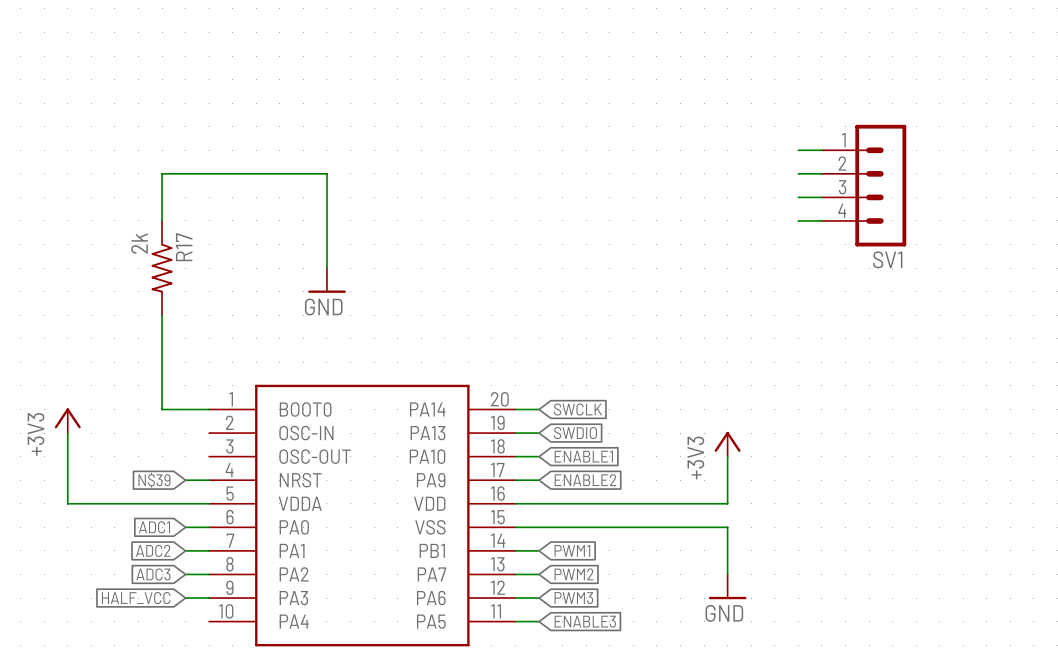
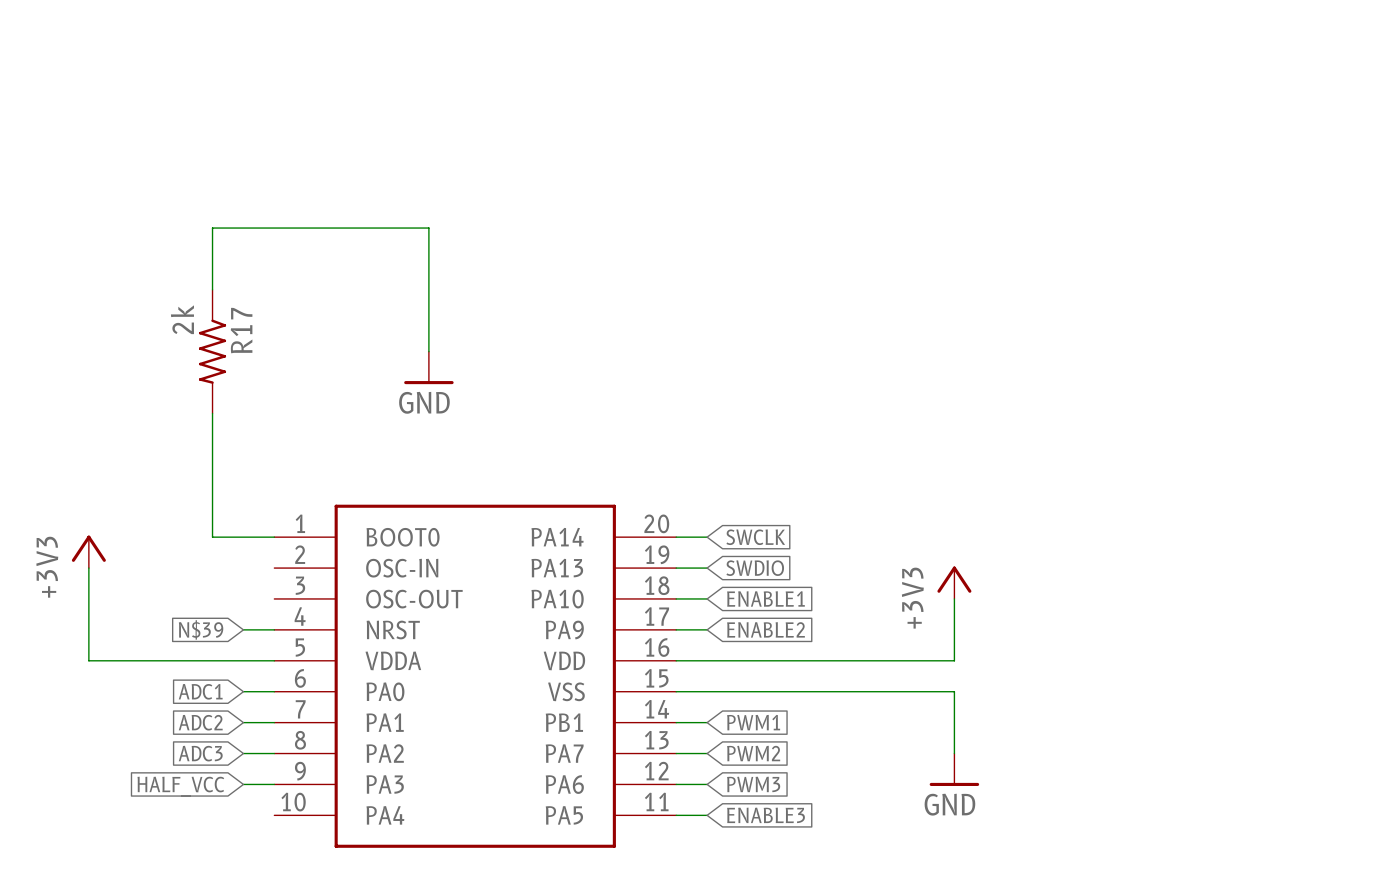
wire: (798, 150) (821, 150) -> none
wire: (798, 173) (821, 173) -> none
SV1: (864, 185) -> none
wire: (798, 197) (821, 197) -> none
wire: (798, 220) (821, 220) -> none

